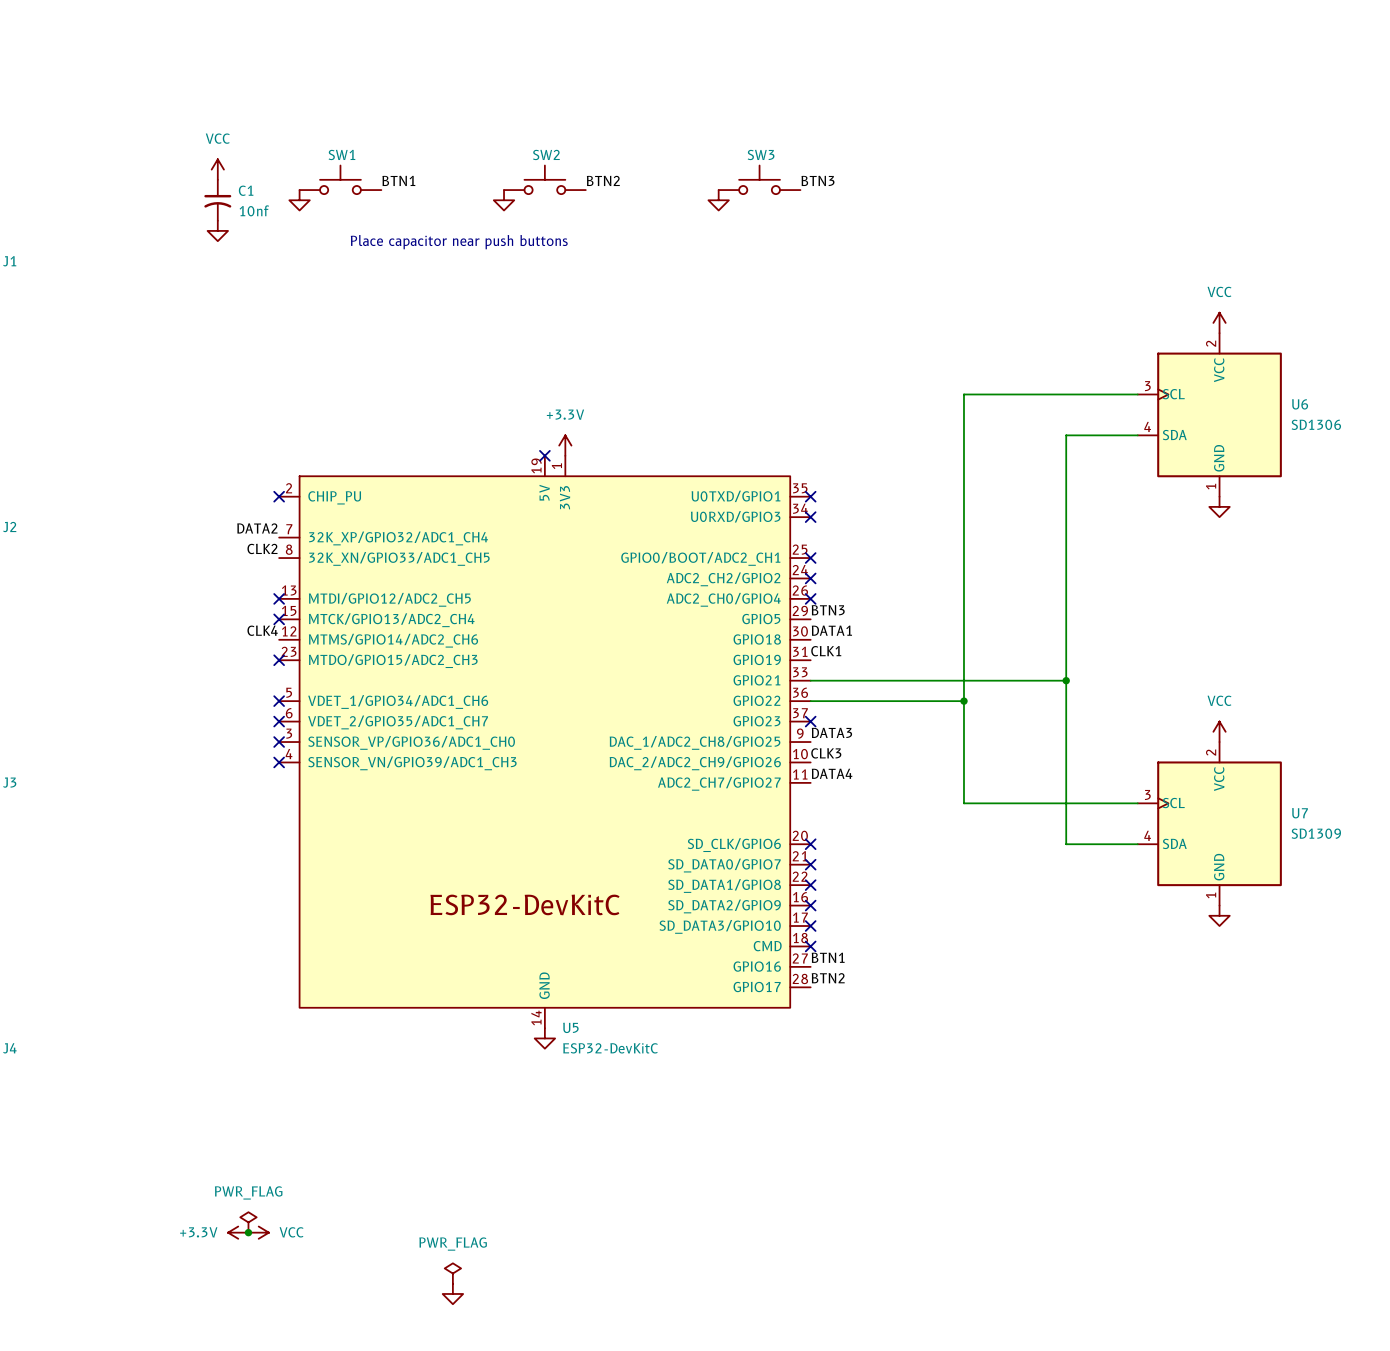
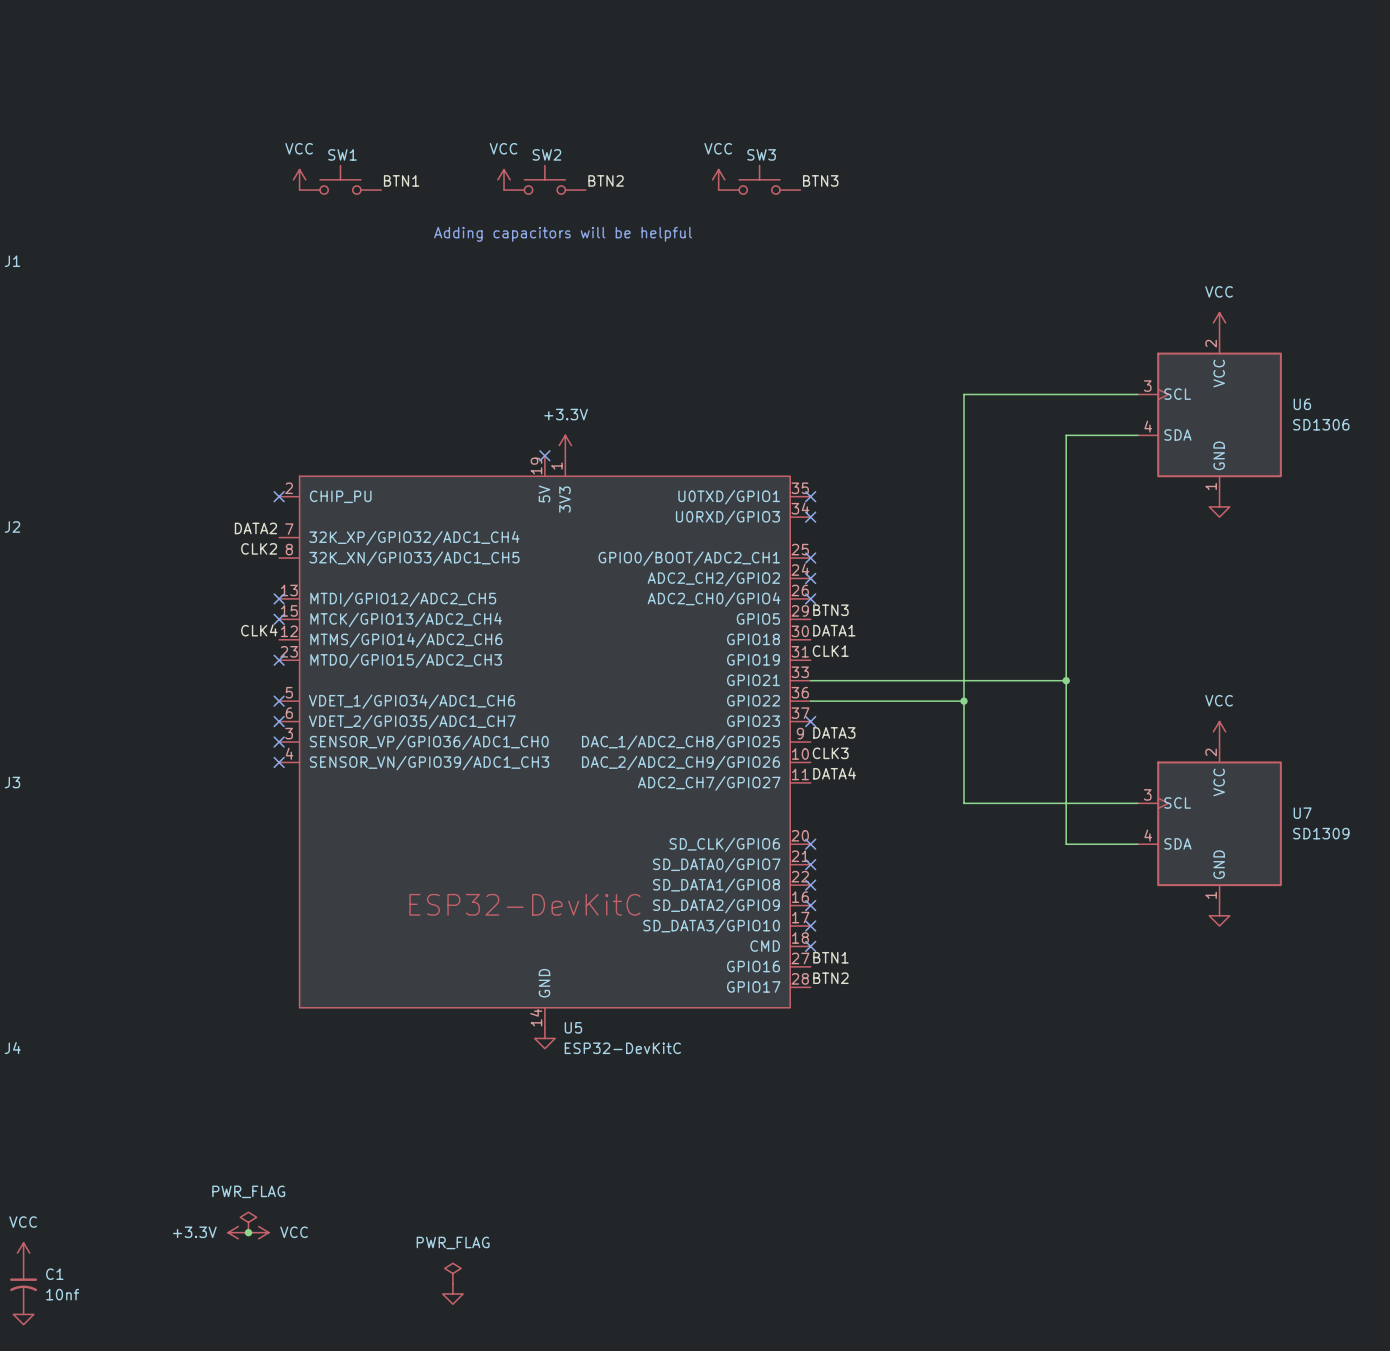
power symbol position: VCC (217, 169) -> VCC (299, 179)
power symbol: none -> VCC (504, 179)
power symbol: none -> VCC (718, 179)
C1 position: (217, 200) -> (23, 1283)
power symbol: (299, 200) -> none
power symbol: (504, 200) -> none
power symbol: (718, 200) -> none
power symbol: (217, 230) -> none
text: none -> Adding capacitors will be helpful (563, 234)
text: Place capacitor near push buttons (459, 242) -> none
power symbol: none -> VCC (23, 1253)
power symbol: none -> (23, 1314)

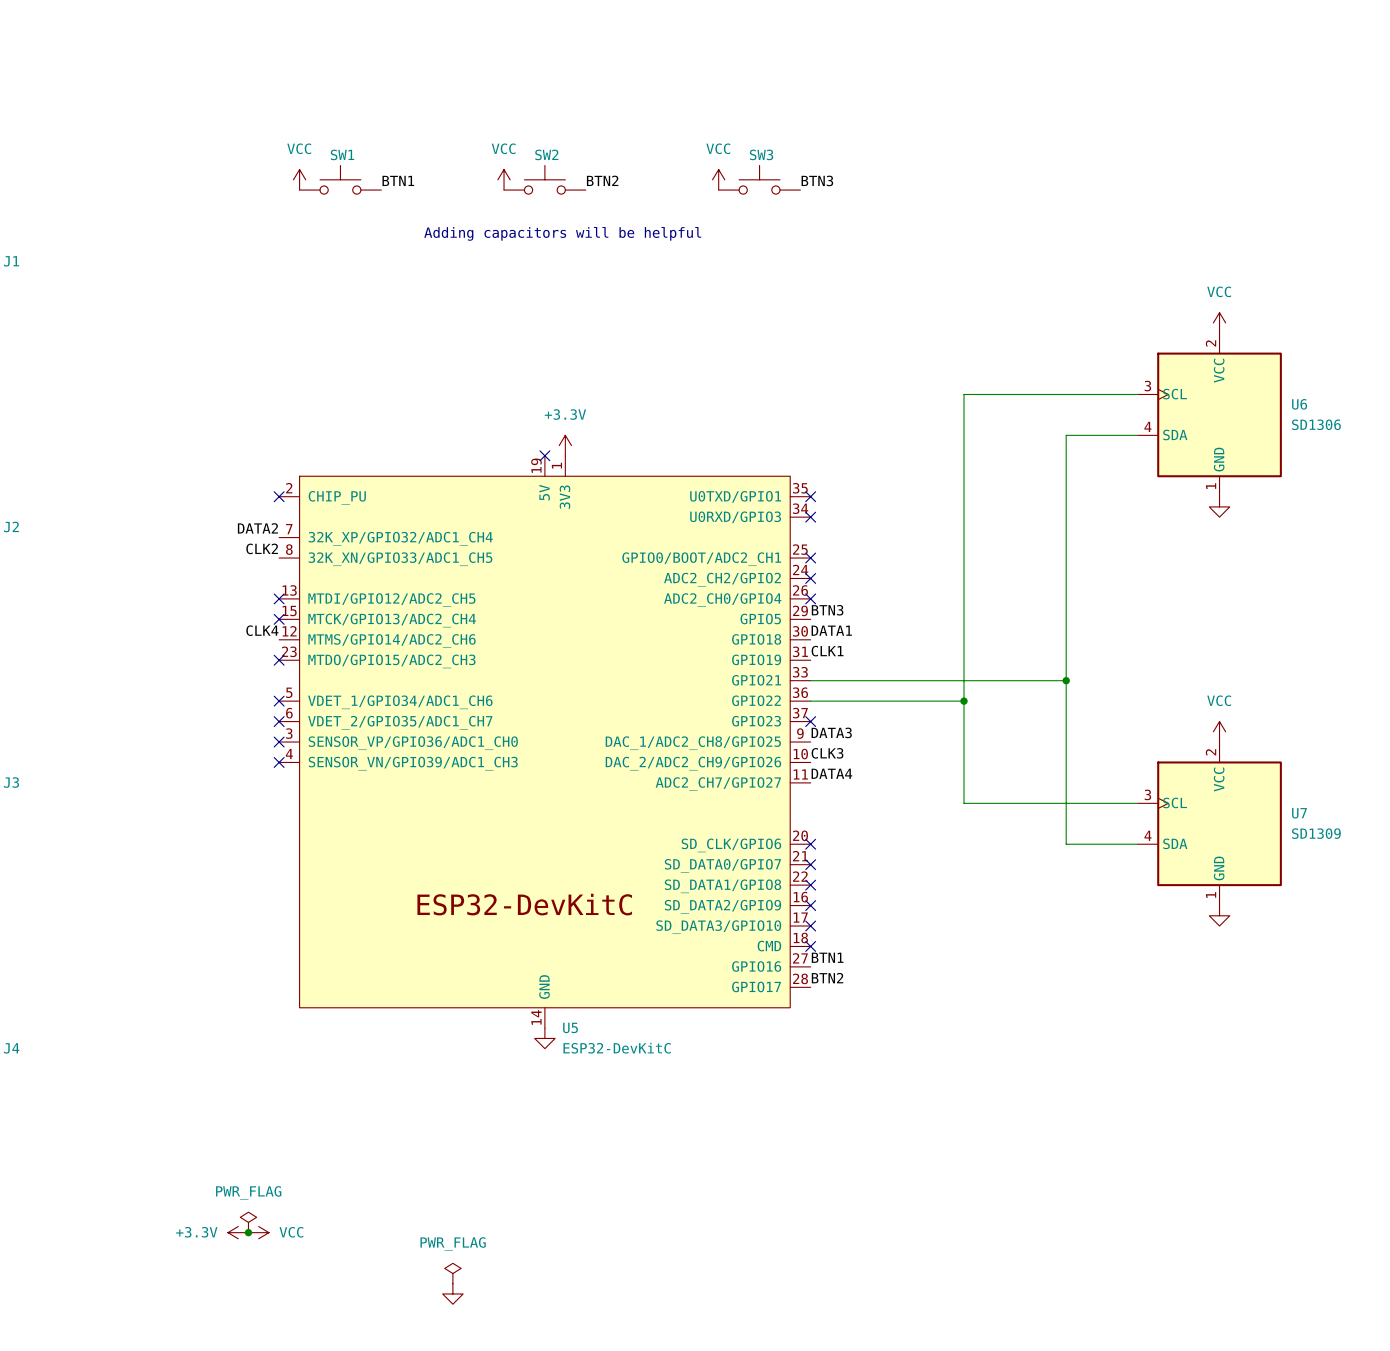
power symbol: VCC (23, 1253) -> none
C1: 10nf (23, 1283) -> none
power symbol: (23, 1314) -> none

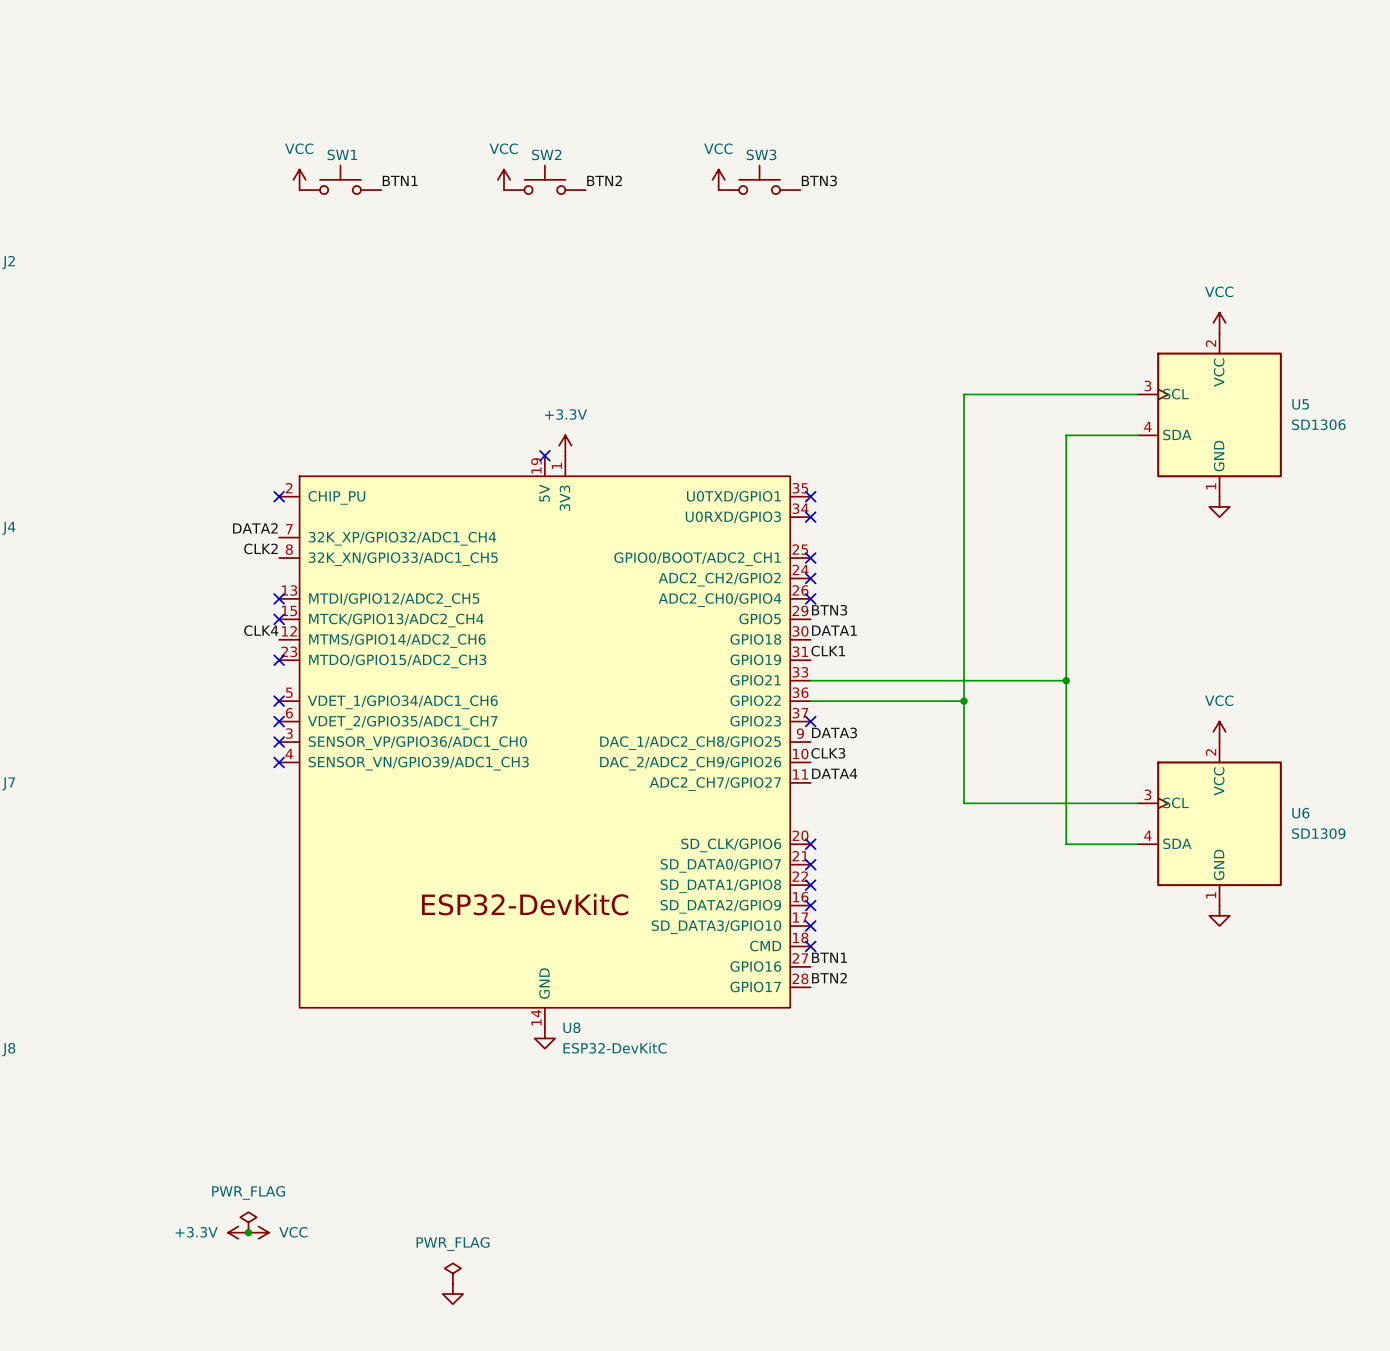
text: Adding capacitors will be helpful (562, 233) -> none
J1 name: J1 (11, 261) -> J2 (8, 262)
U6 name: U6 (1299, 404) -> U5 (1300, 404)
J2 name: J2 (11, 526) -> J4 (8, 528)
J3 name: J3 (11, 782) -> J7 (8, 783)
U7 name: U7 (1299, 813) -> U6 (1300, 813)
U5 name: U5 (570, 1027) -> U8 (571, 1027)
J4 name: J4 (11, 1048) -> J8 (8, 1049)

